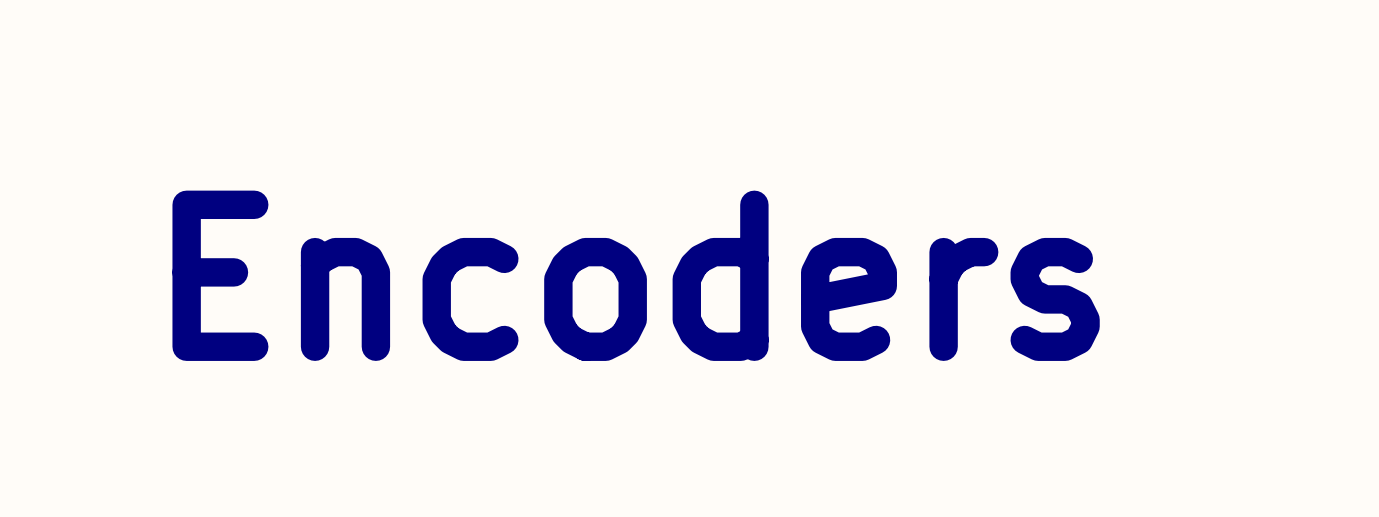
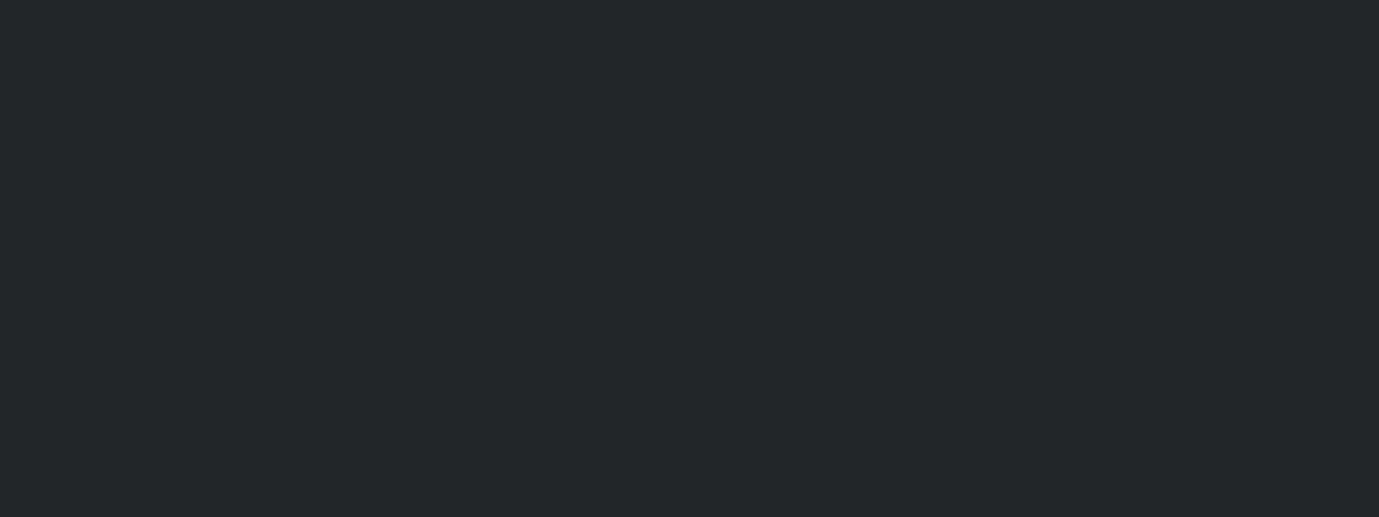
text: Encoders (636, 275) -> none

